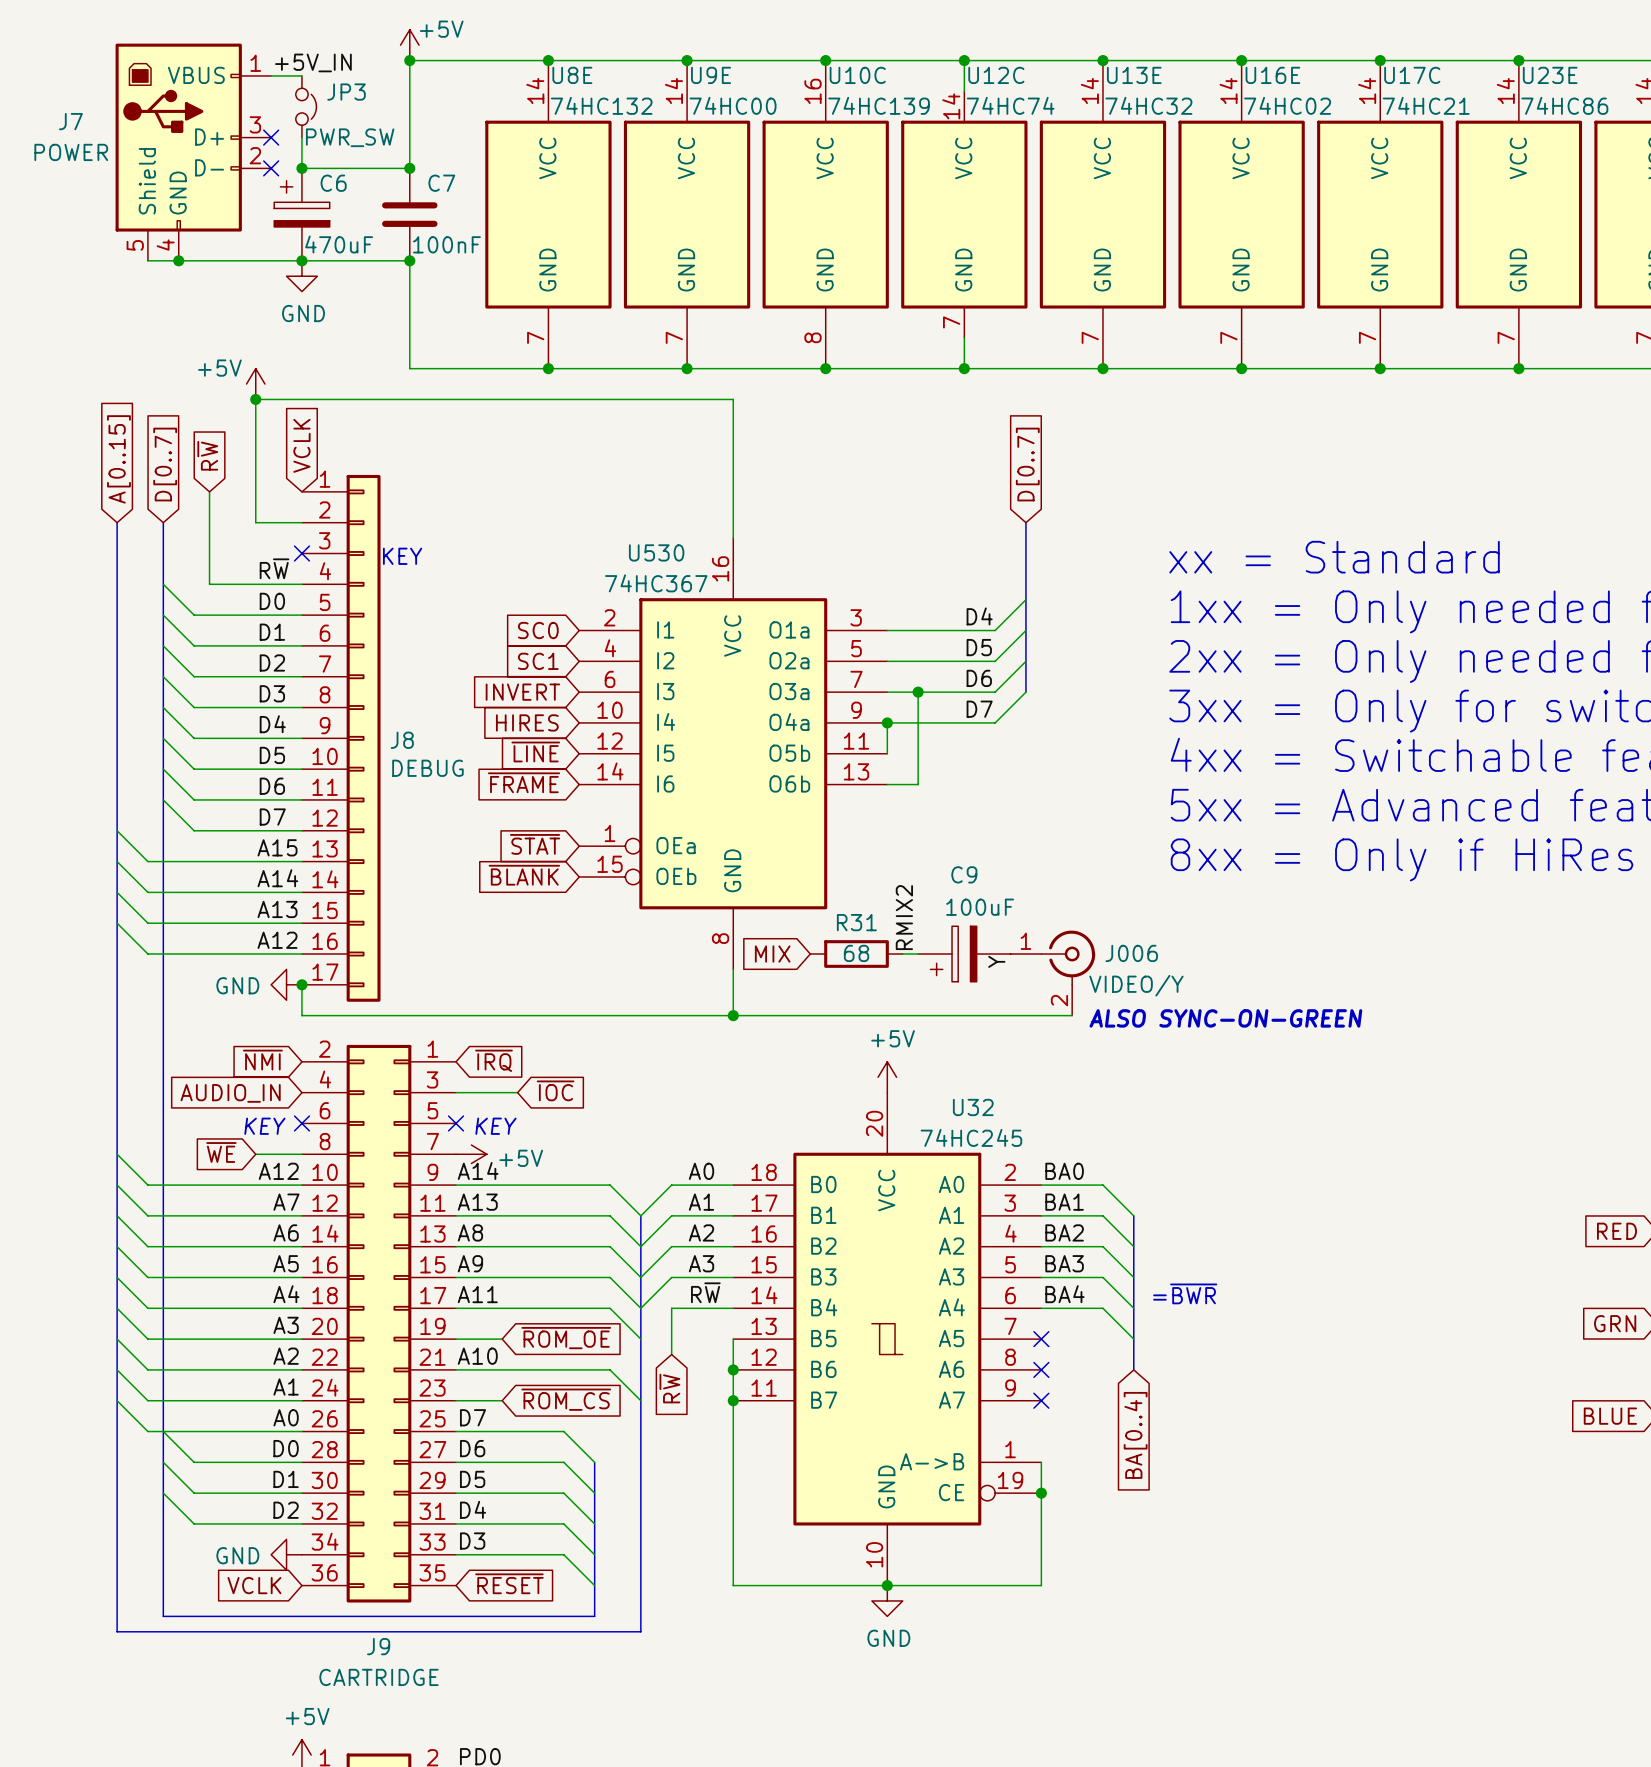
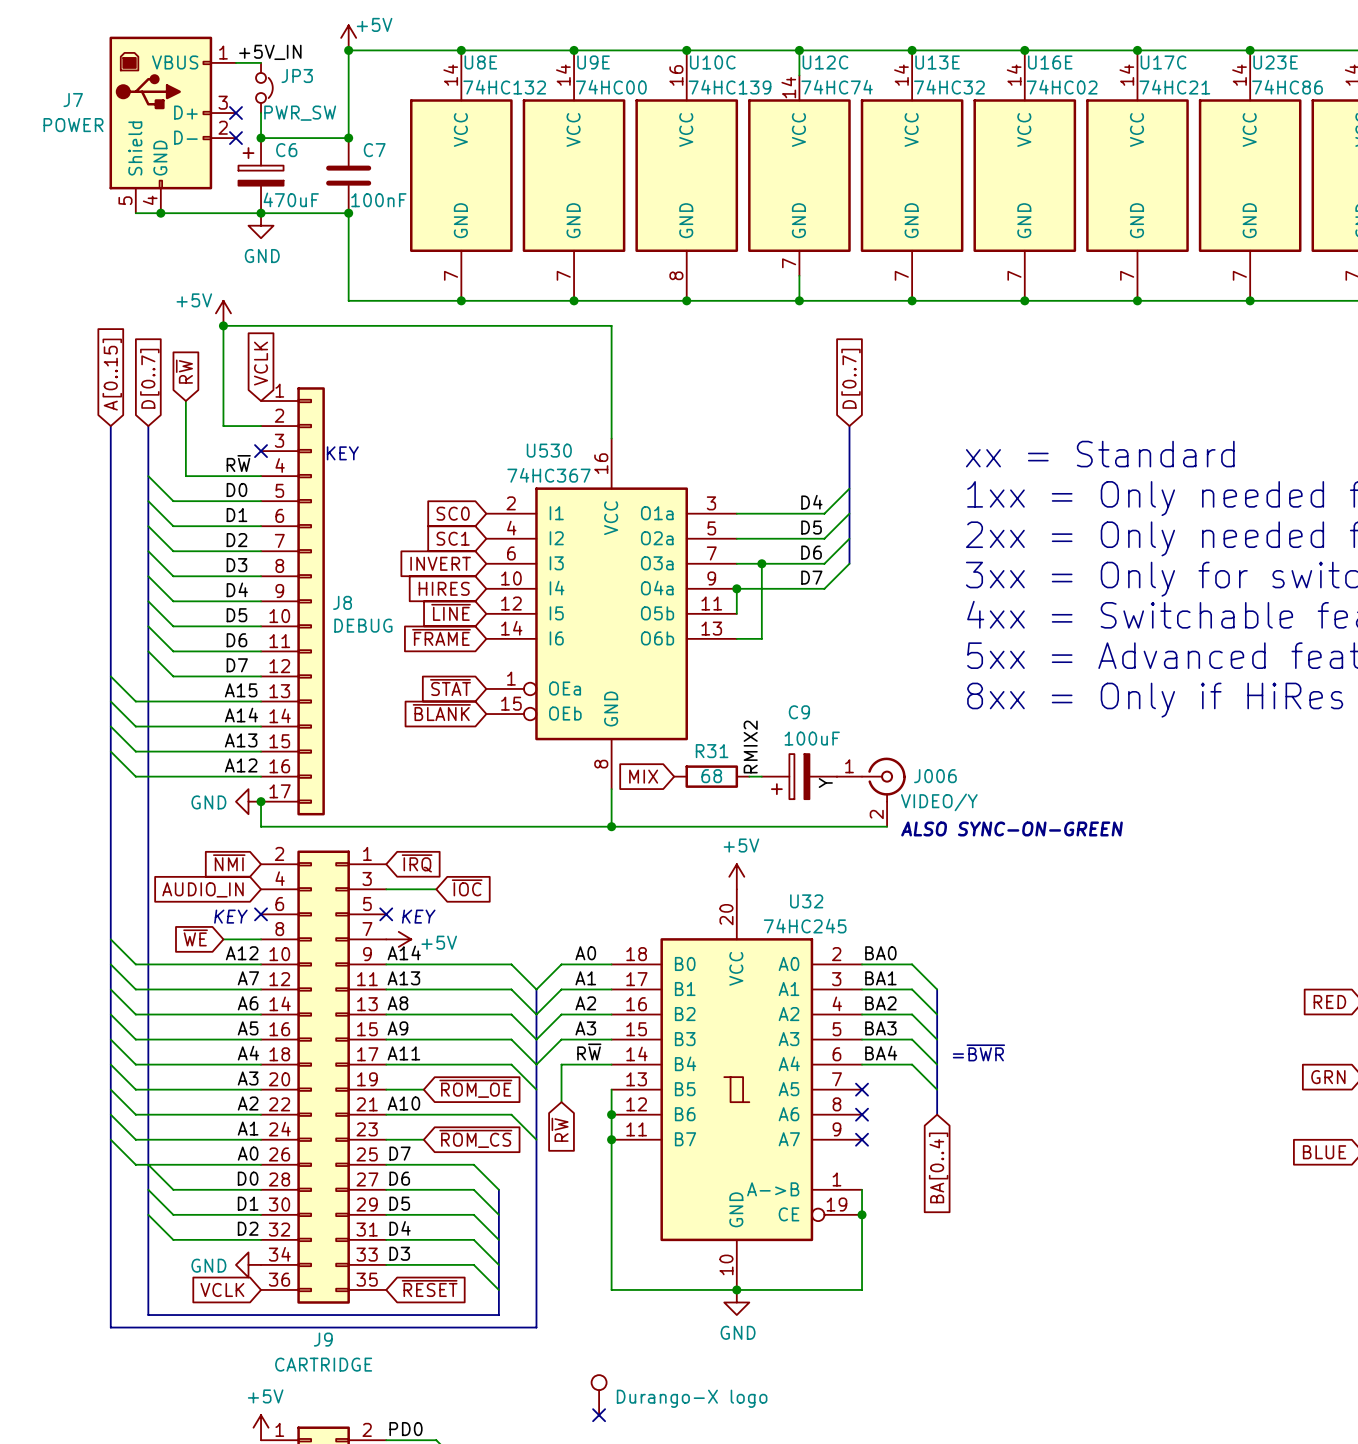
part: none -> Durango-X logo (599, 1395)
no-connect mark: none -> (599, 1415)

